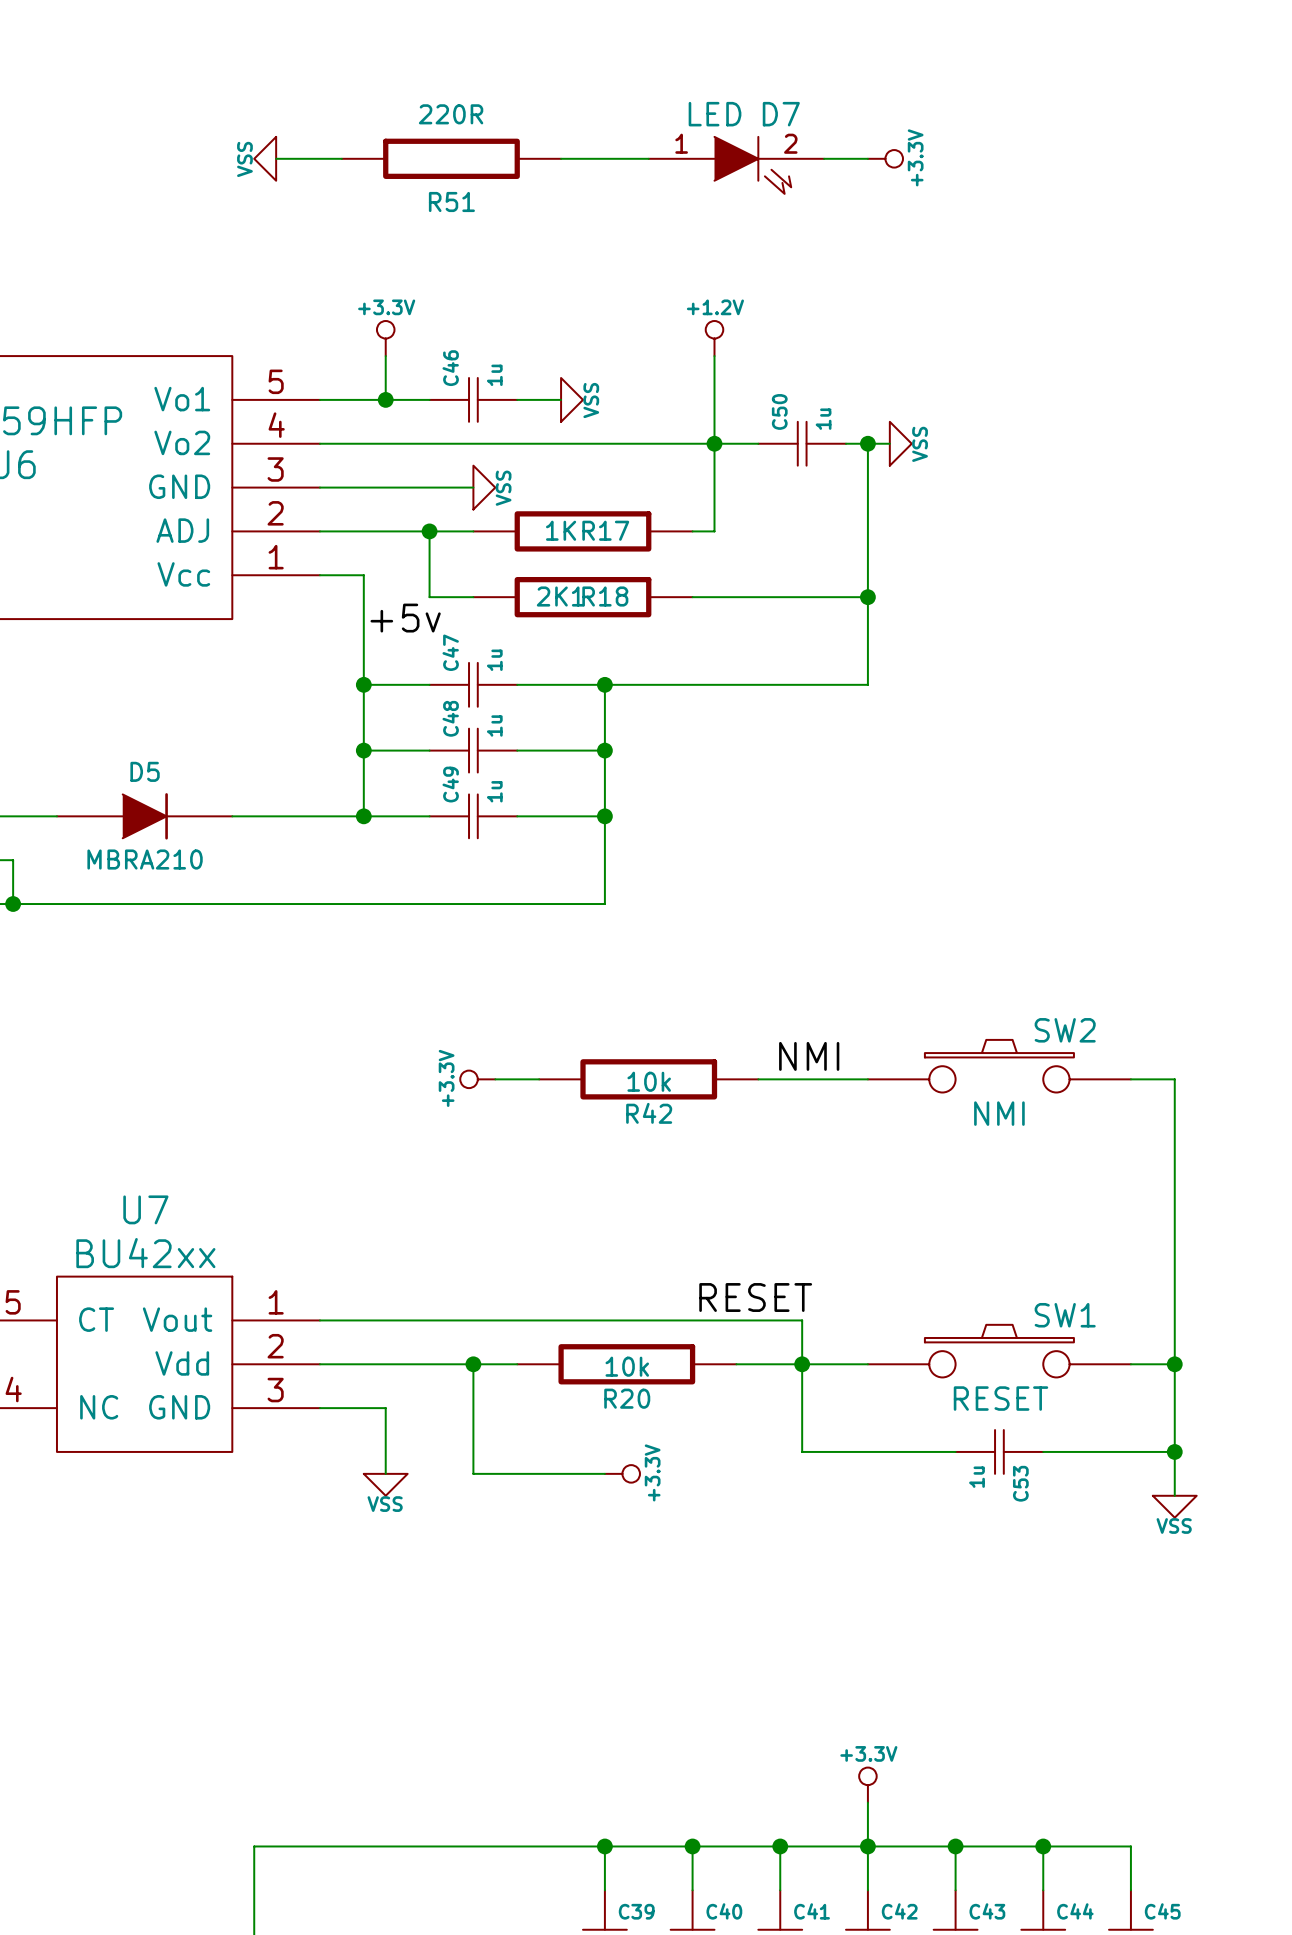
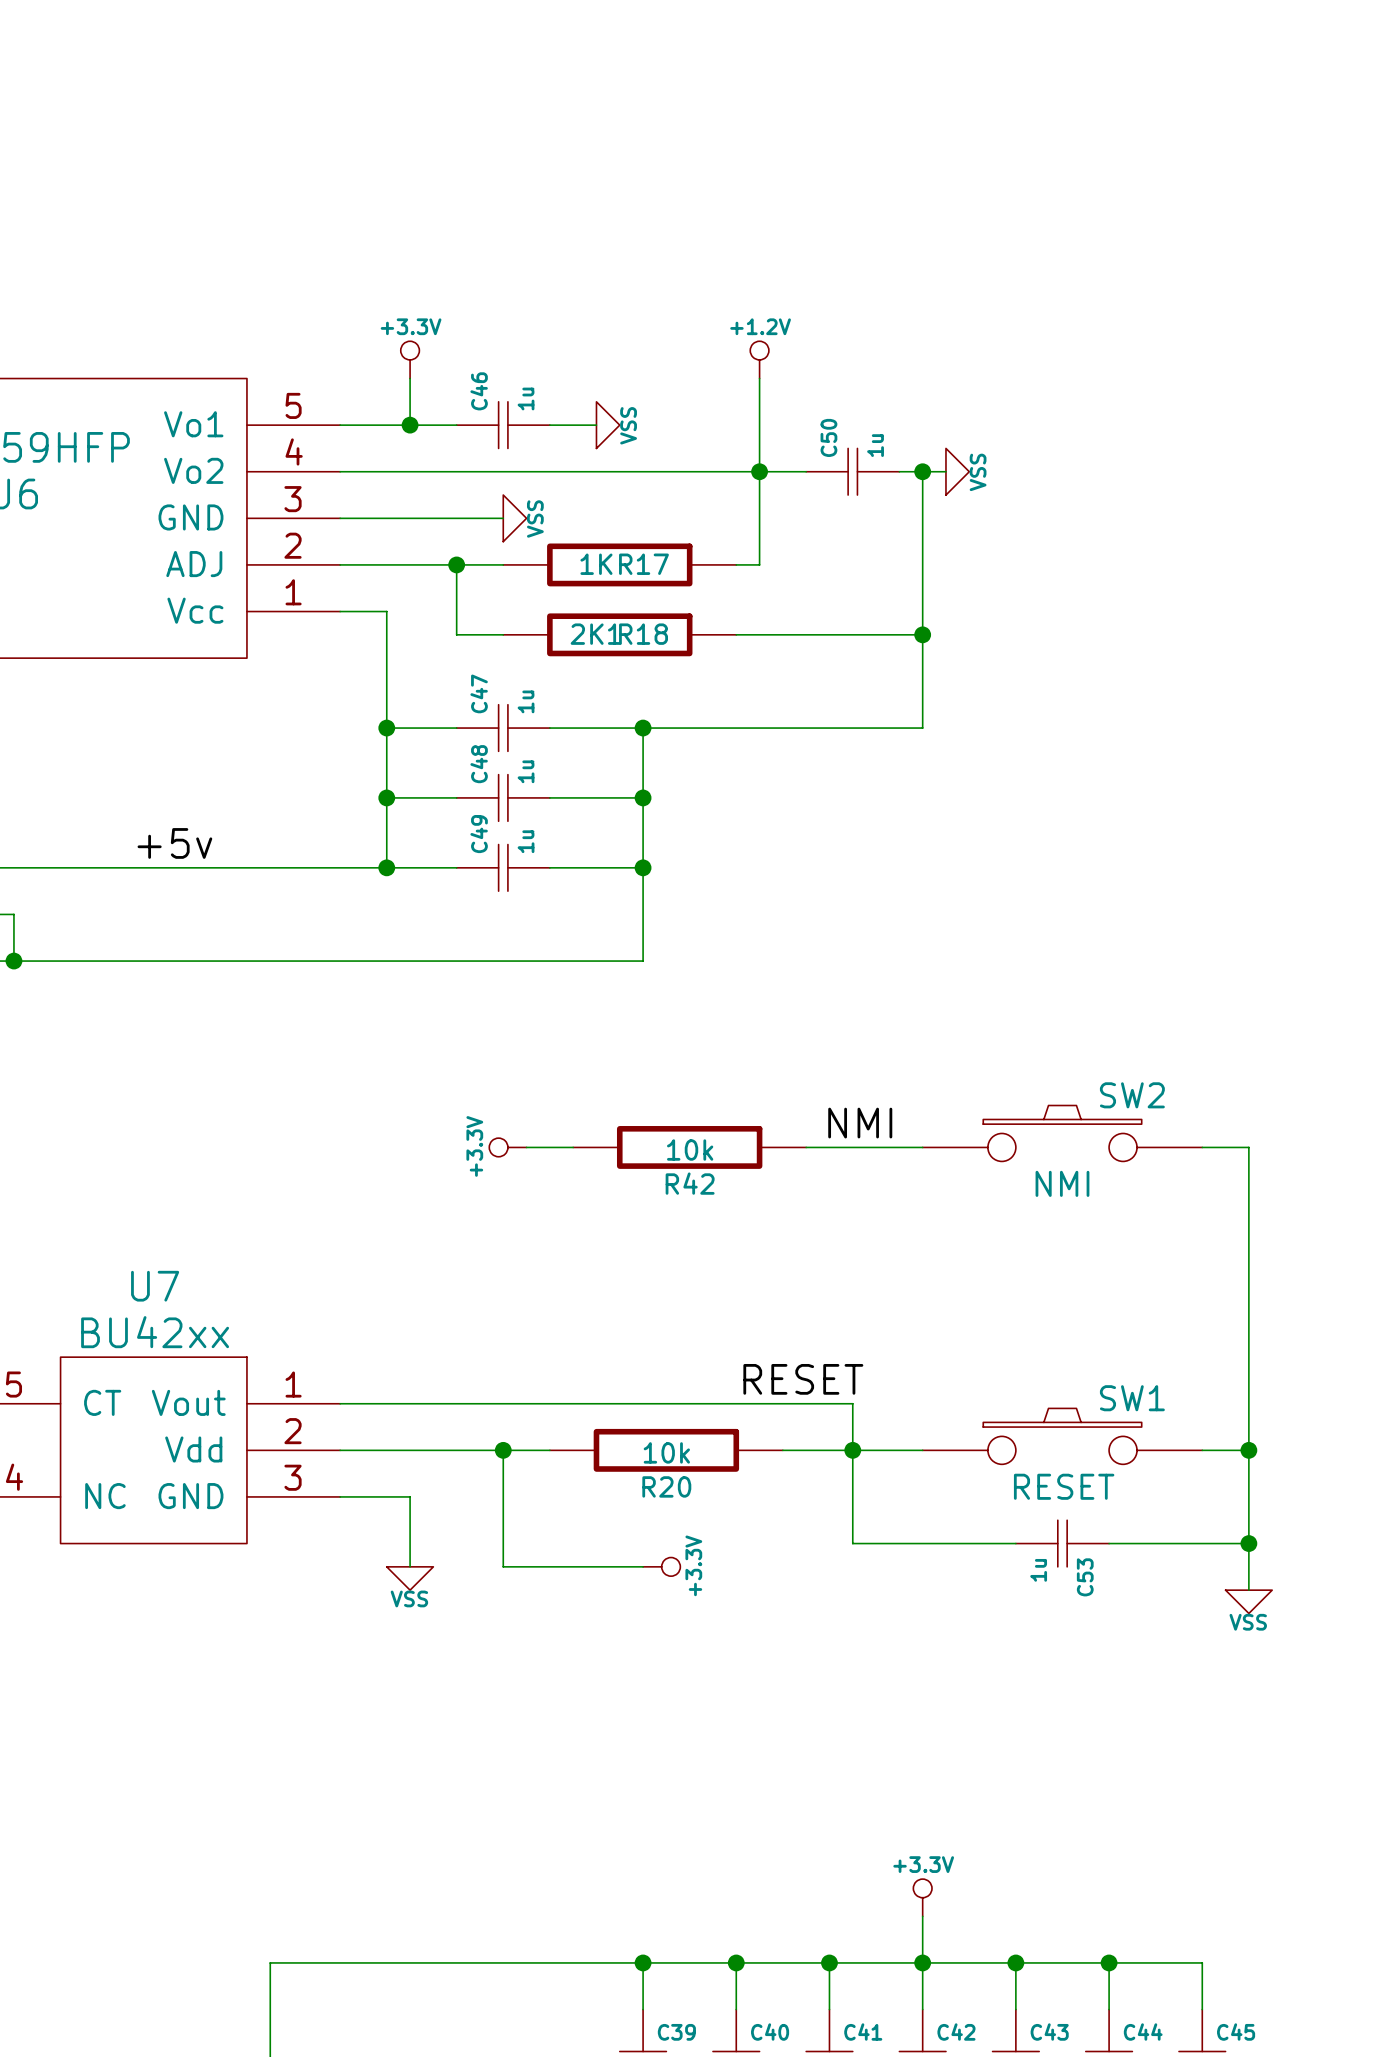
power symbol: VSS (265, 158) -> none
wire: (276, 158) (341, 158) -> none
R51: 220R (451, 158) -> none
wire: (561, 158) (648, 158) -> none
wire: (824, 158) (867, 158) -> none
power symbol: +3.3V (885, 158) -> none
D7: LED (736, 165) -> none
label position: +5v (405, 618) -> +5v (174, 843)
D5: MBRA210 (144, 816) -> none

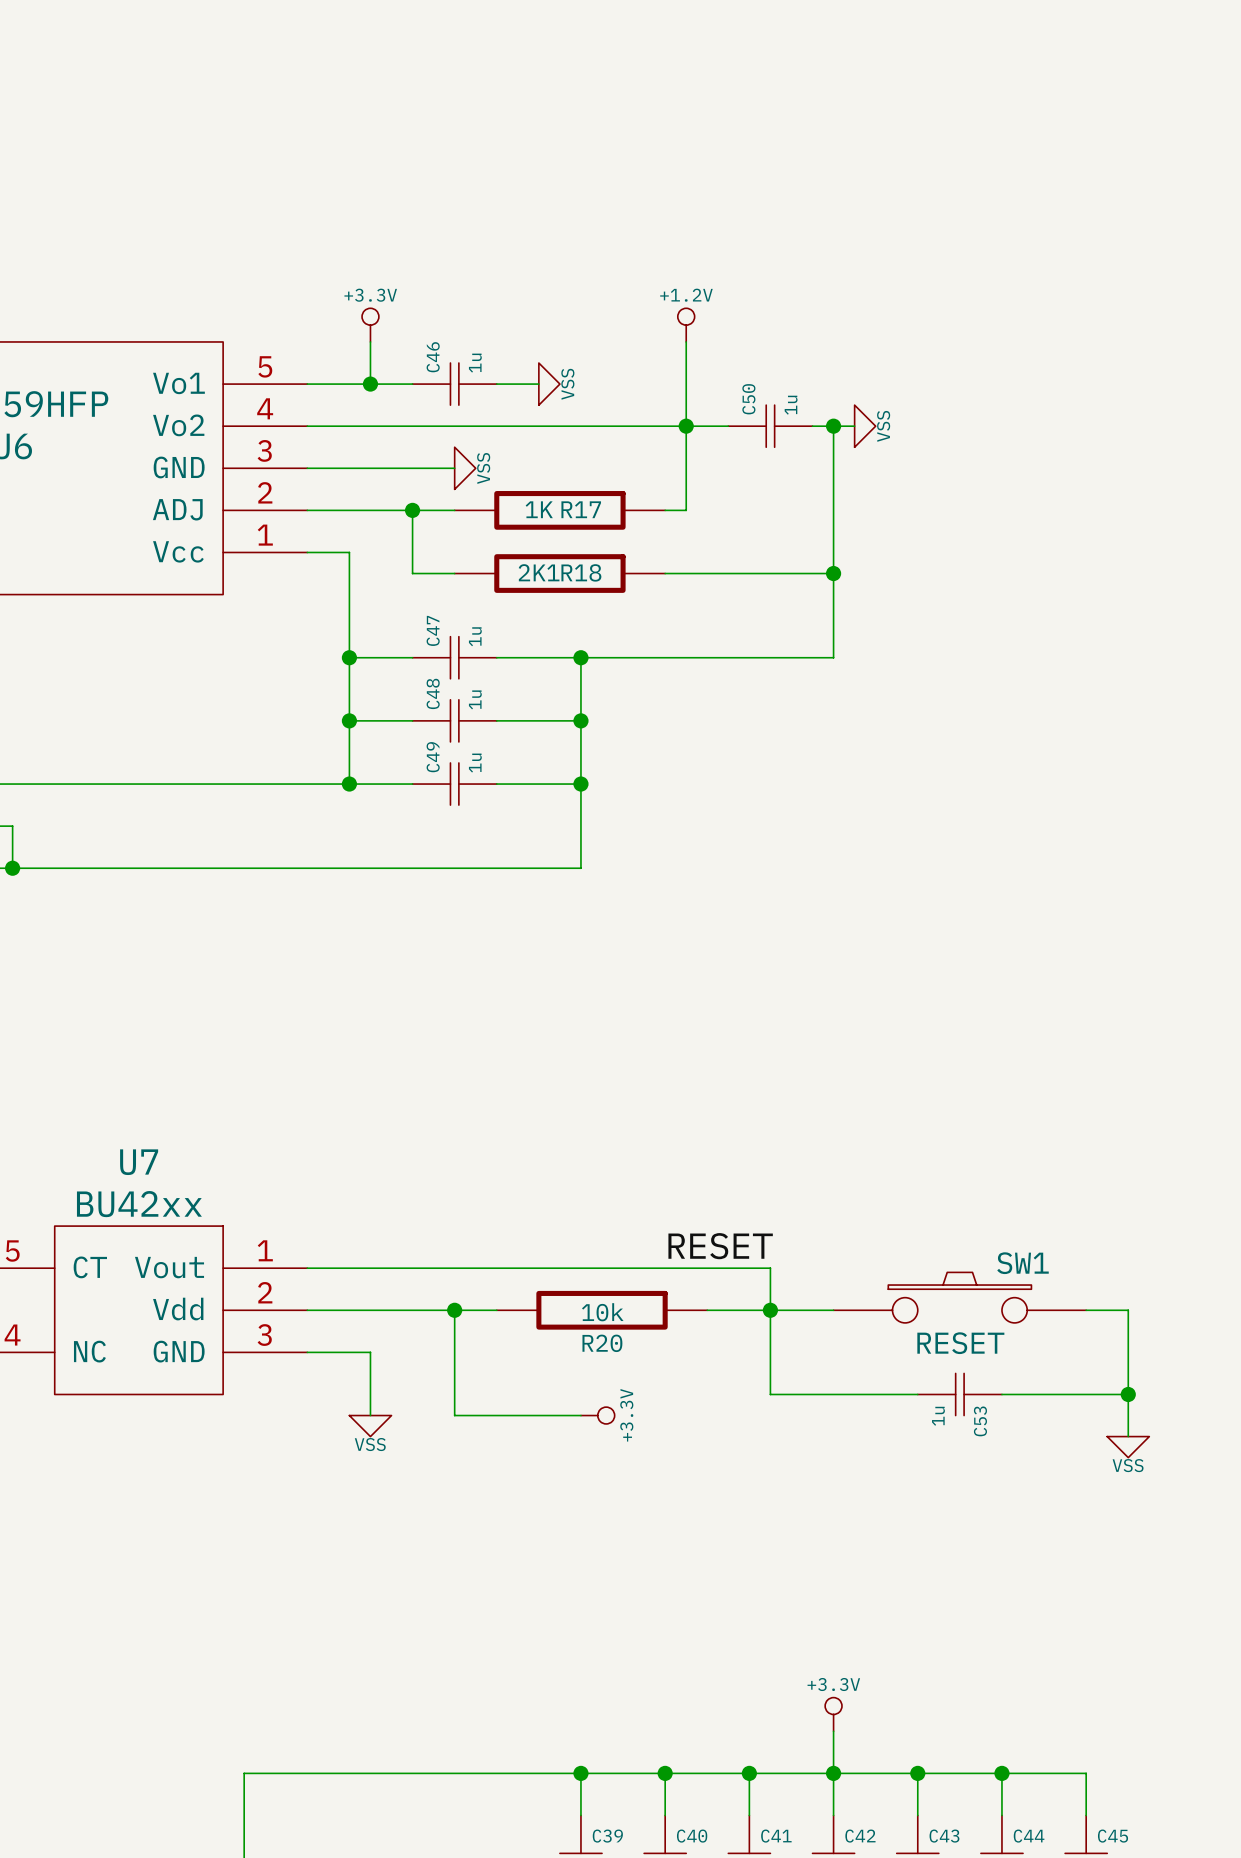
label: +5v (174, 843) -> none
label: NMI (860, 1123) -> none
SW2: NMI (1062, 1133) -> none
power symbol: +3.3V (507, 1147) -> none
wire: (526, 1147) (573, 1147) -> none
R42: 10k (689, 1147) -> none
wire: (806, 1147) (922, 1147) -> none
wire: (1202, 1147) (1248, 1147) (1248, 1450) -> none
junction: (1248, 1450) -> none

